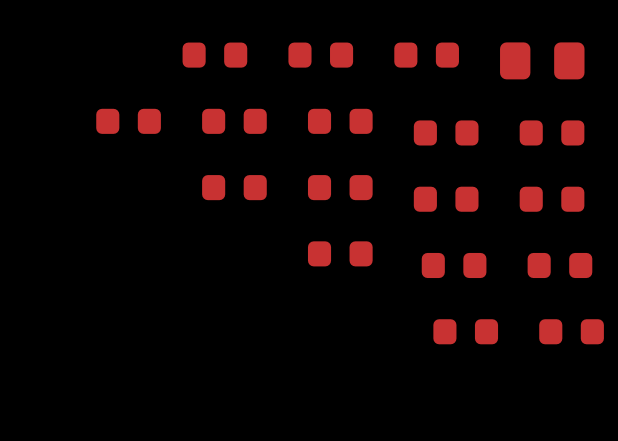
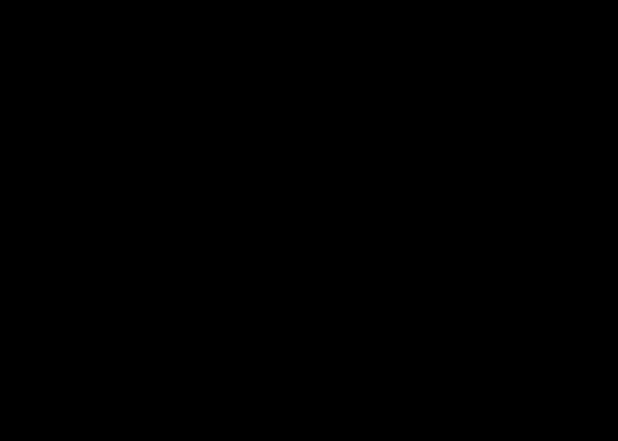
part: (214, 55) -> none
part: (320, 55) -> none
part: (426, 55) -> none
part: (542, 60) -> none
part: (128, 121) -> none
part: (234, 121) -> none
part: (340, 121) -> none
part: (446, 132) -> none
part: (552, 132) -> none
part: (234, 187) -> none
part: (340, 187) -> none
part: (446, 199) -> none
part: (552, 199) -> none
part: (340, 253) -> none
part: (454, 265) -> none
part: (559, 265) -> none
part: (465, 331) -> none
part: (571, 331) -> none

